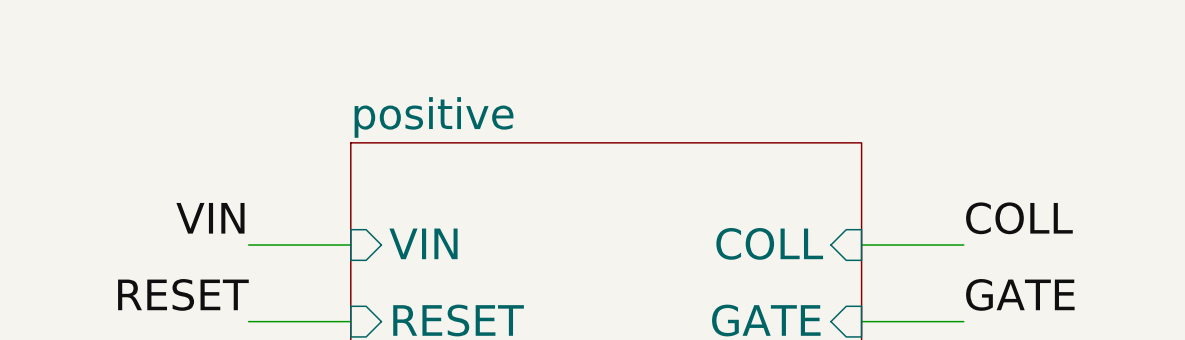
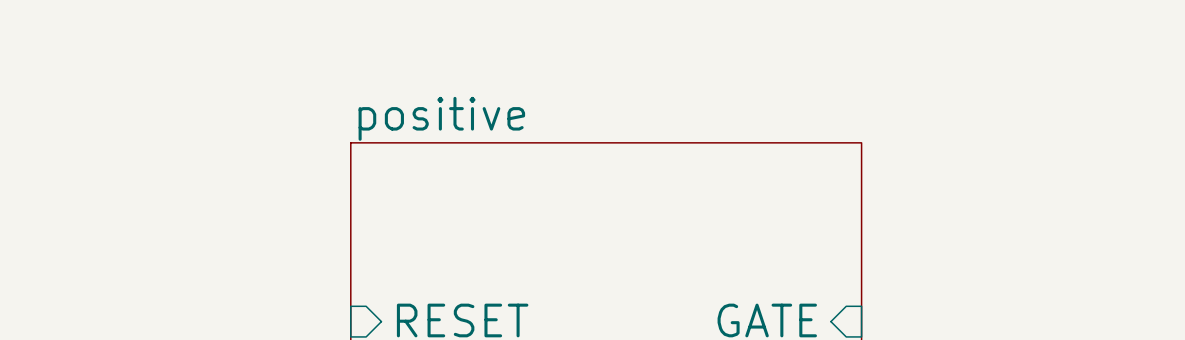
label: VIN (210, 218) -> none
label: COLL (1019, 218) -> none
sheet pin: VIN (423, 243) -> none
sheet pin: COLL (769, 243) -> none
wire: (248, 245) (350, 245) -> none
wire: (861, 245) (963, 245) -> none
label: RESET (183, 294) -> none
label: GATE (1020, 294) -> none
wire: (248, 321) (350, 321) -> none
wire: (861, 321) (963, 321) -> none

